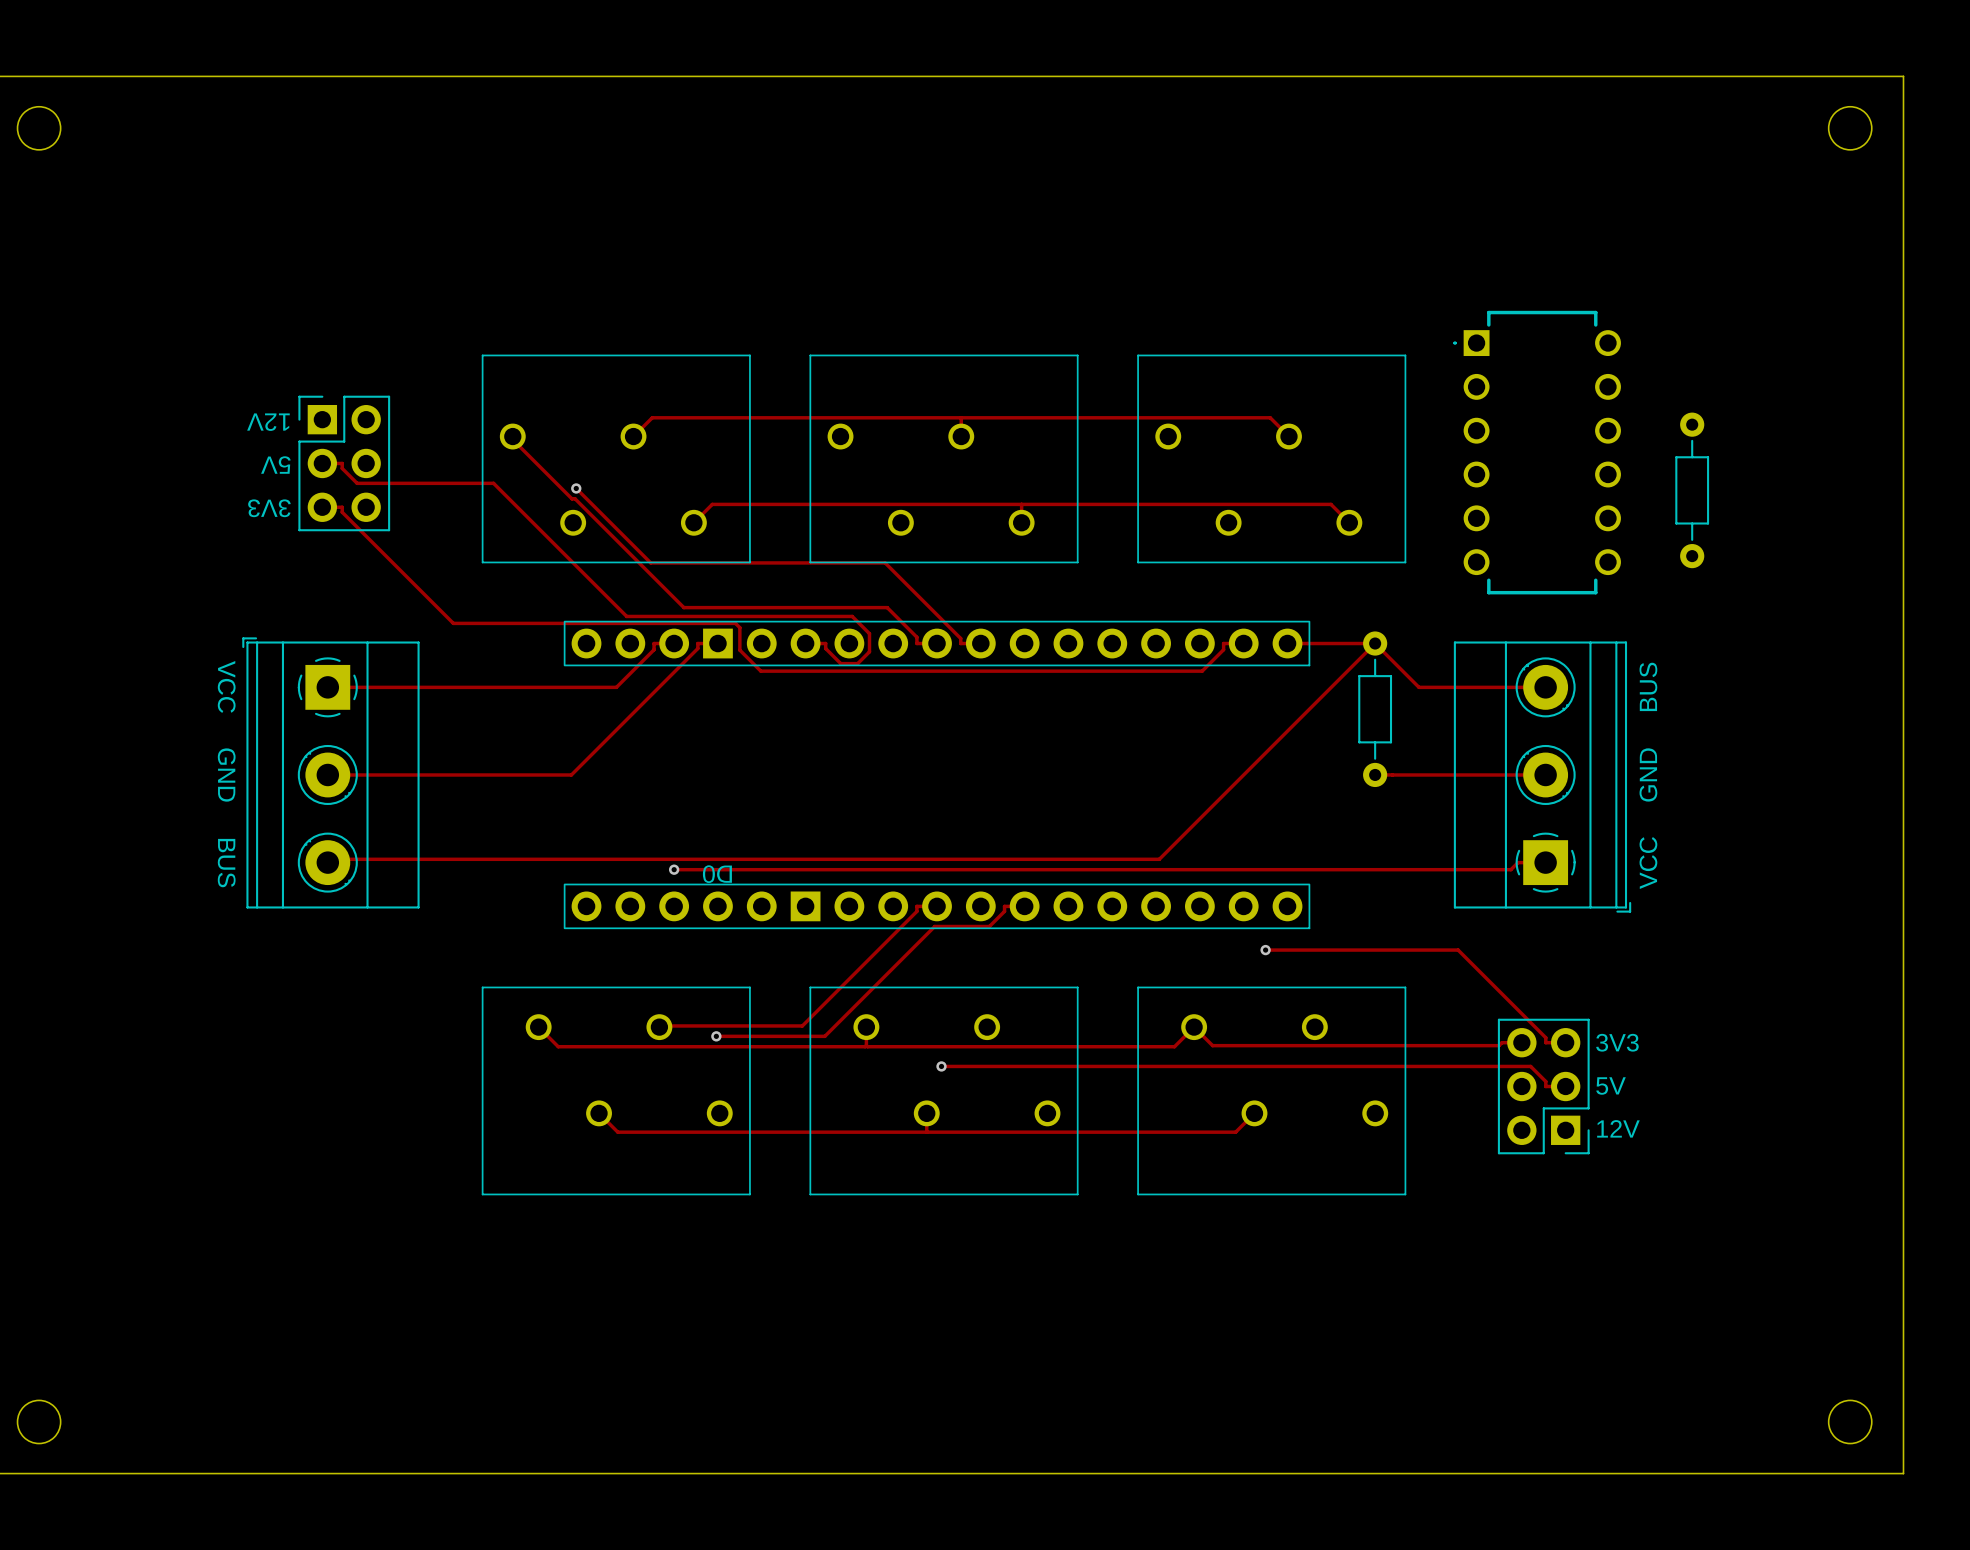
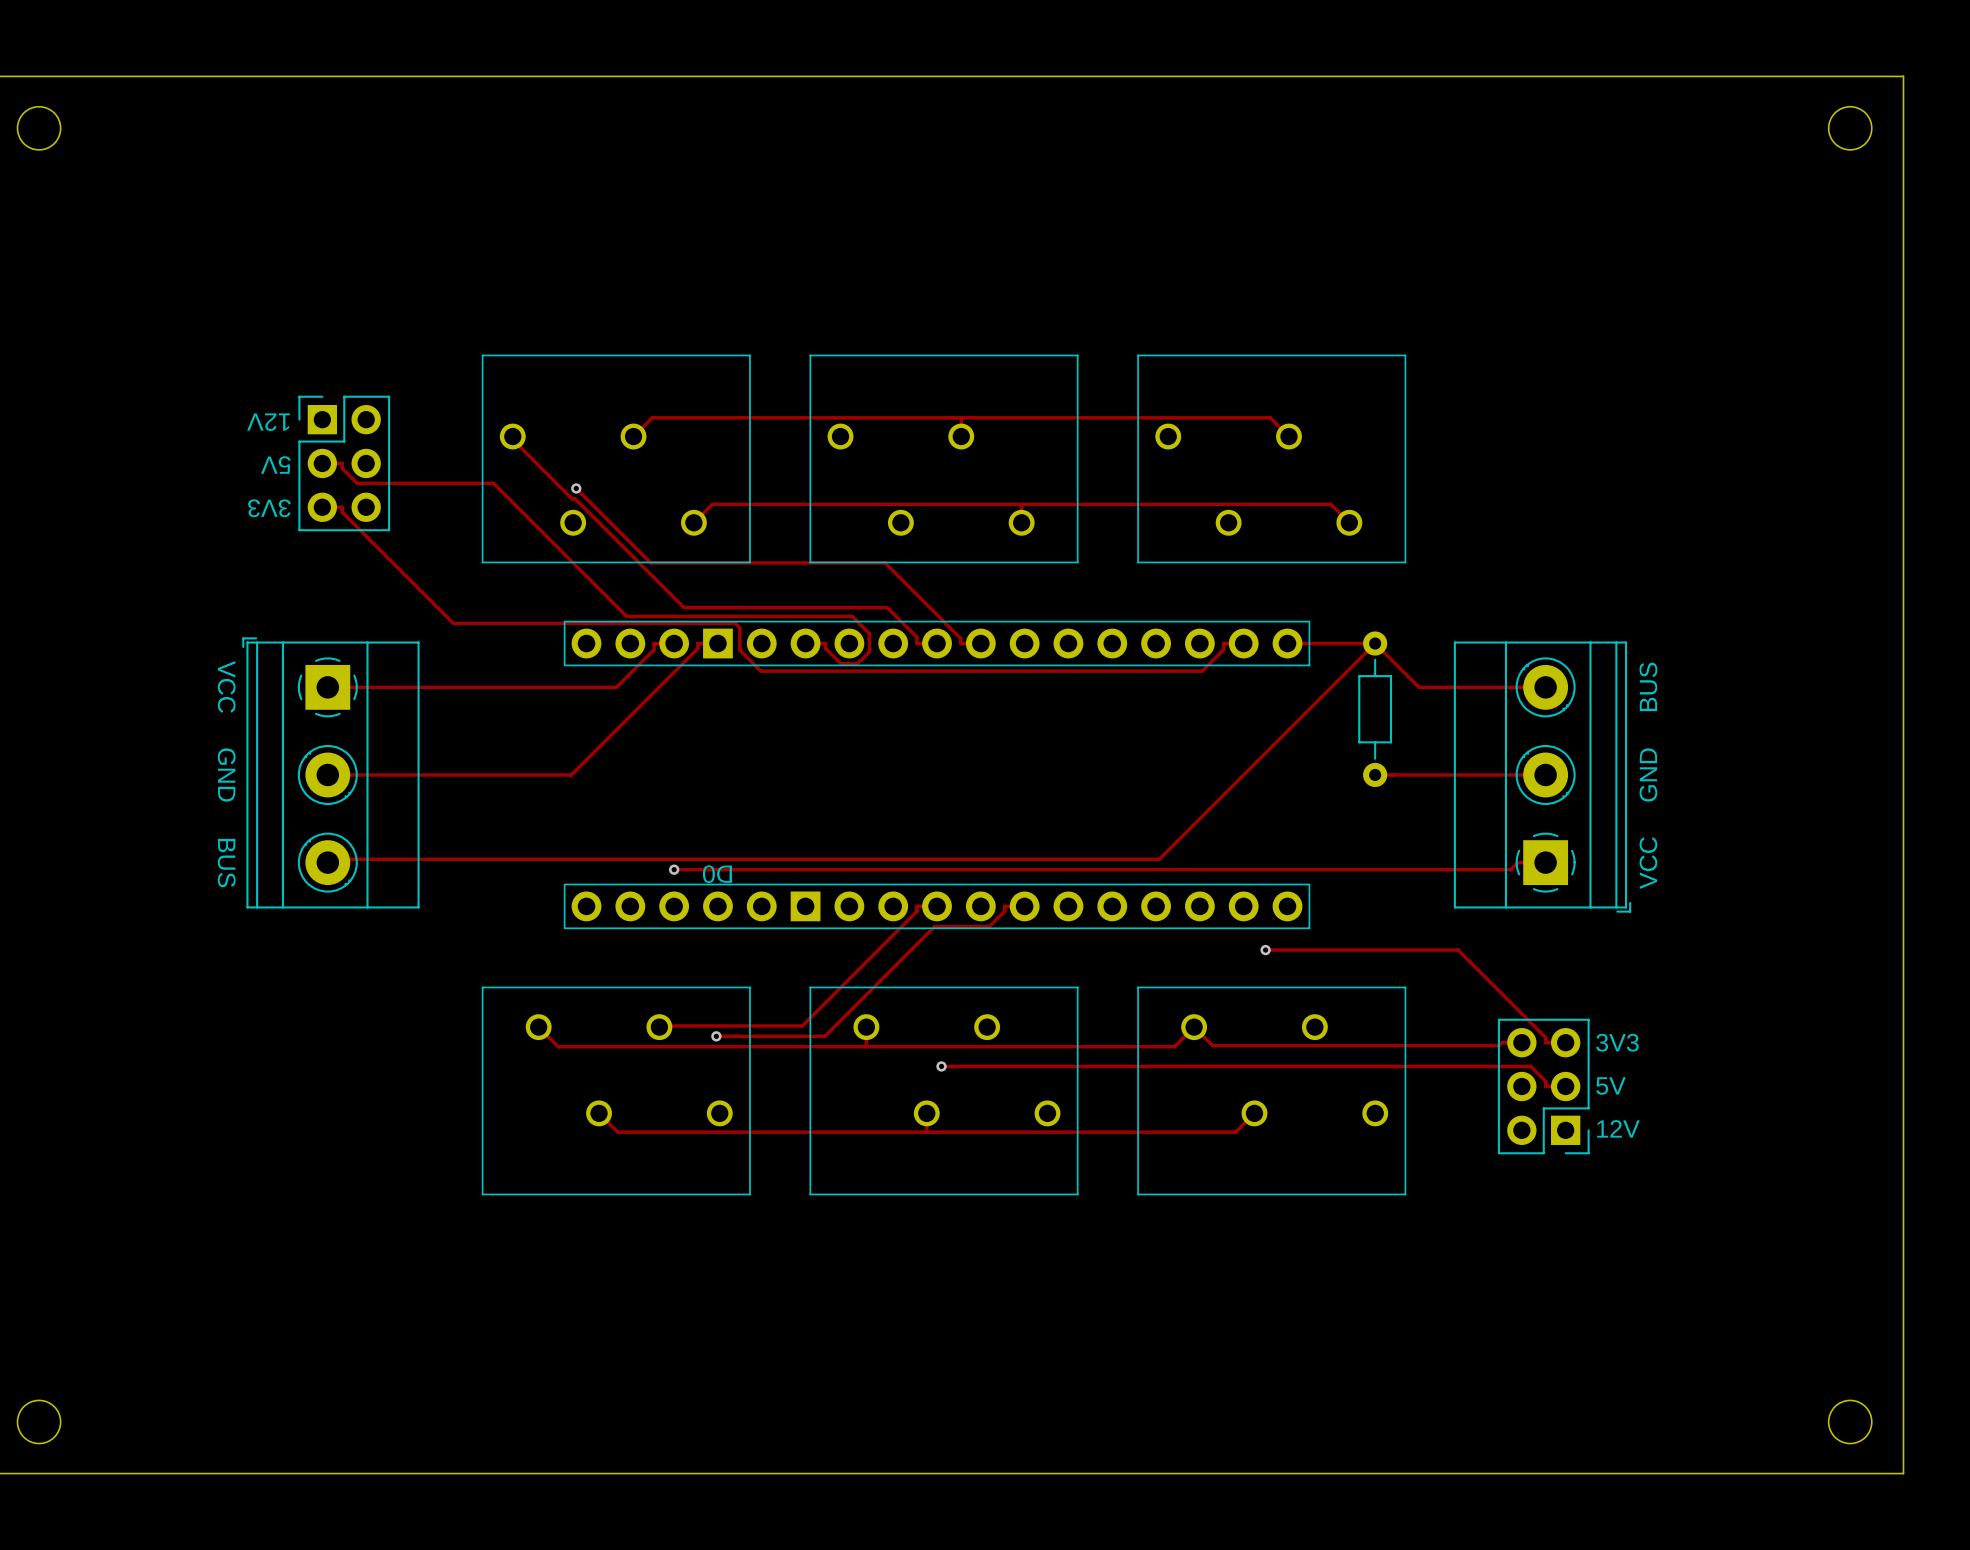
part: (1537, 452) -> none
part: (1692, 490) -> none

